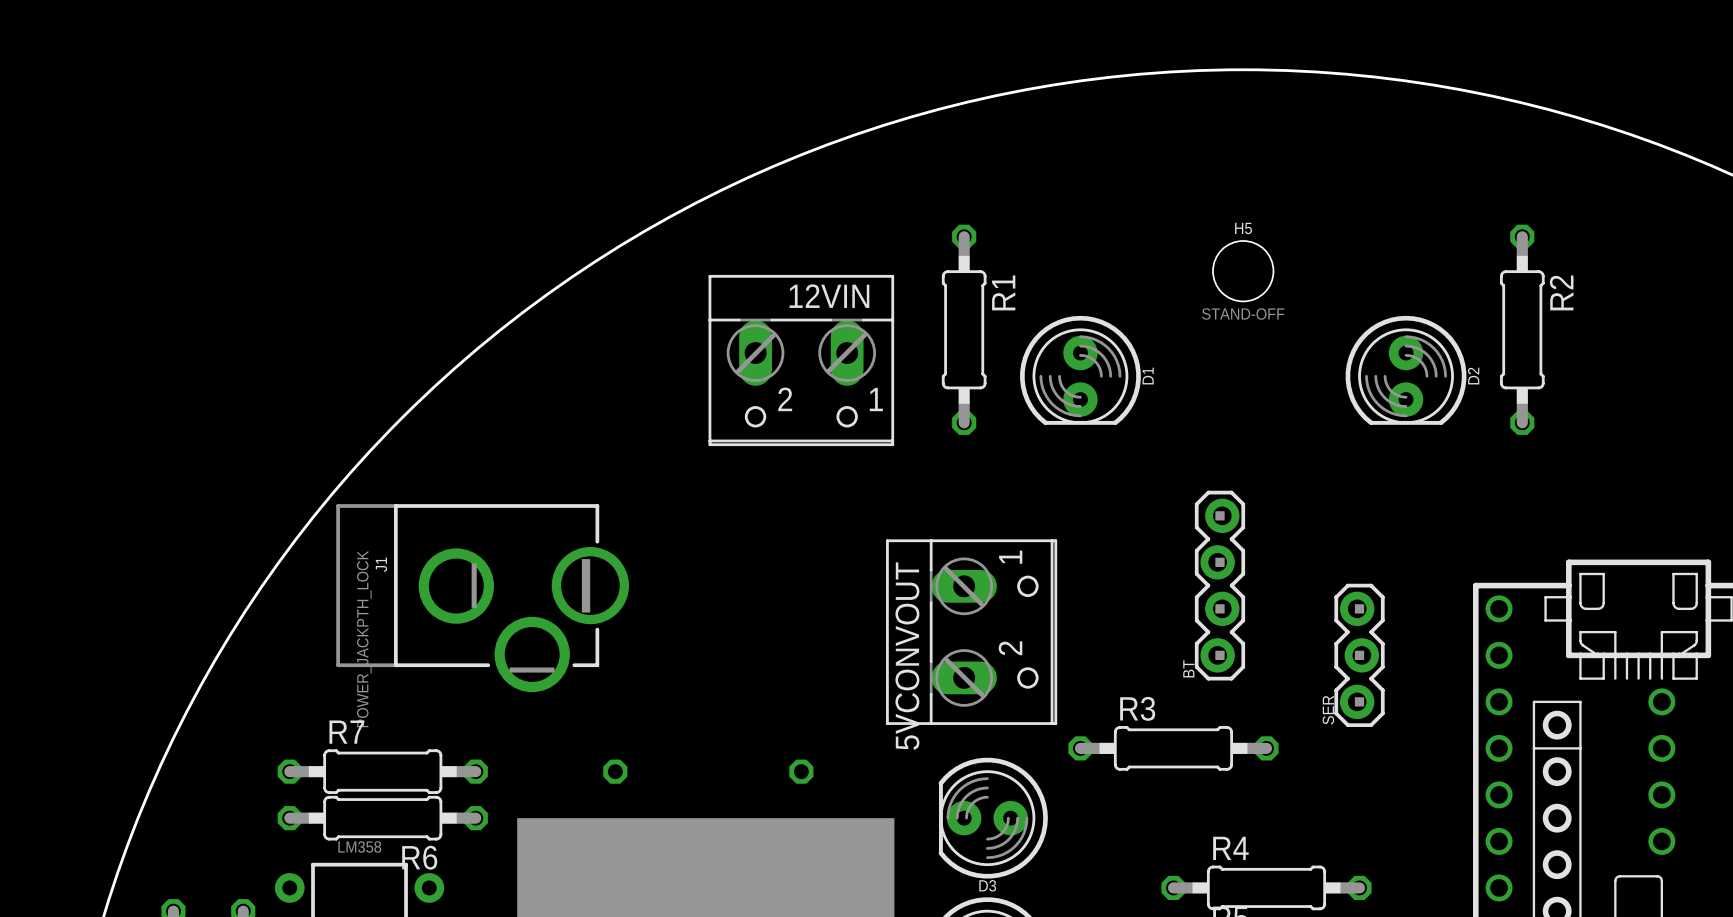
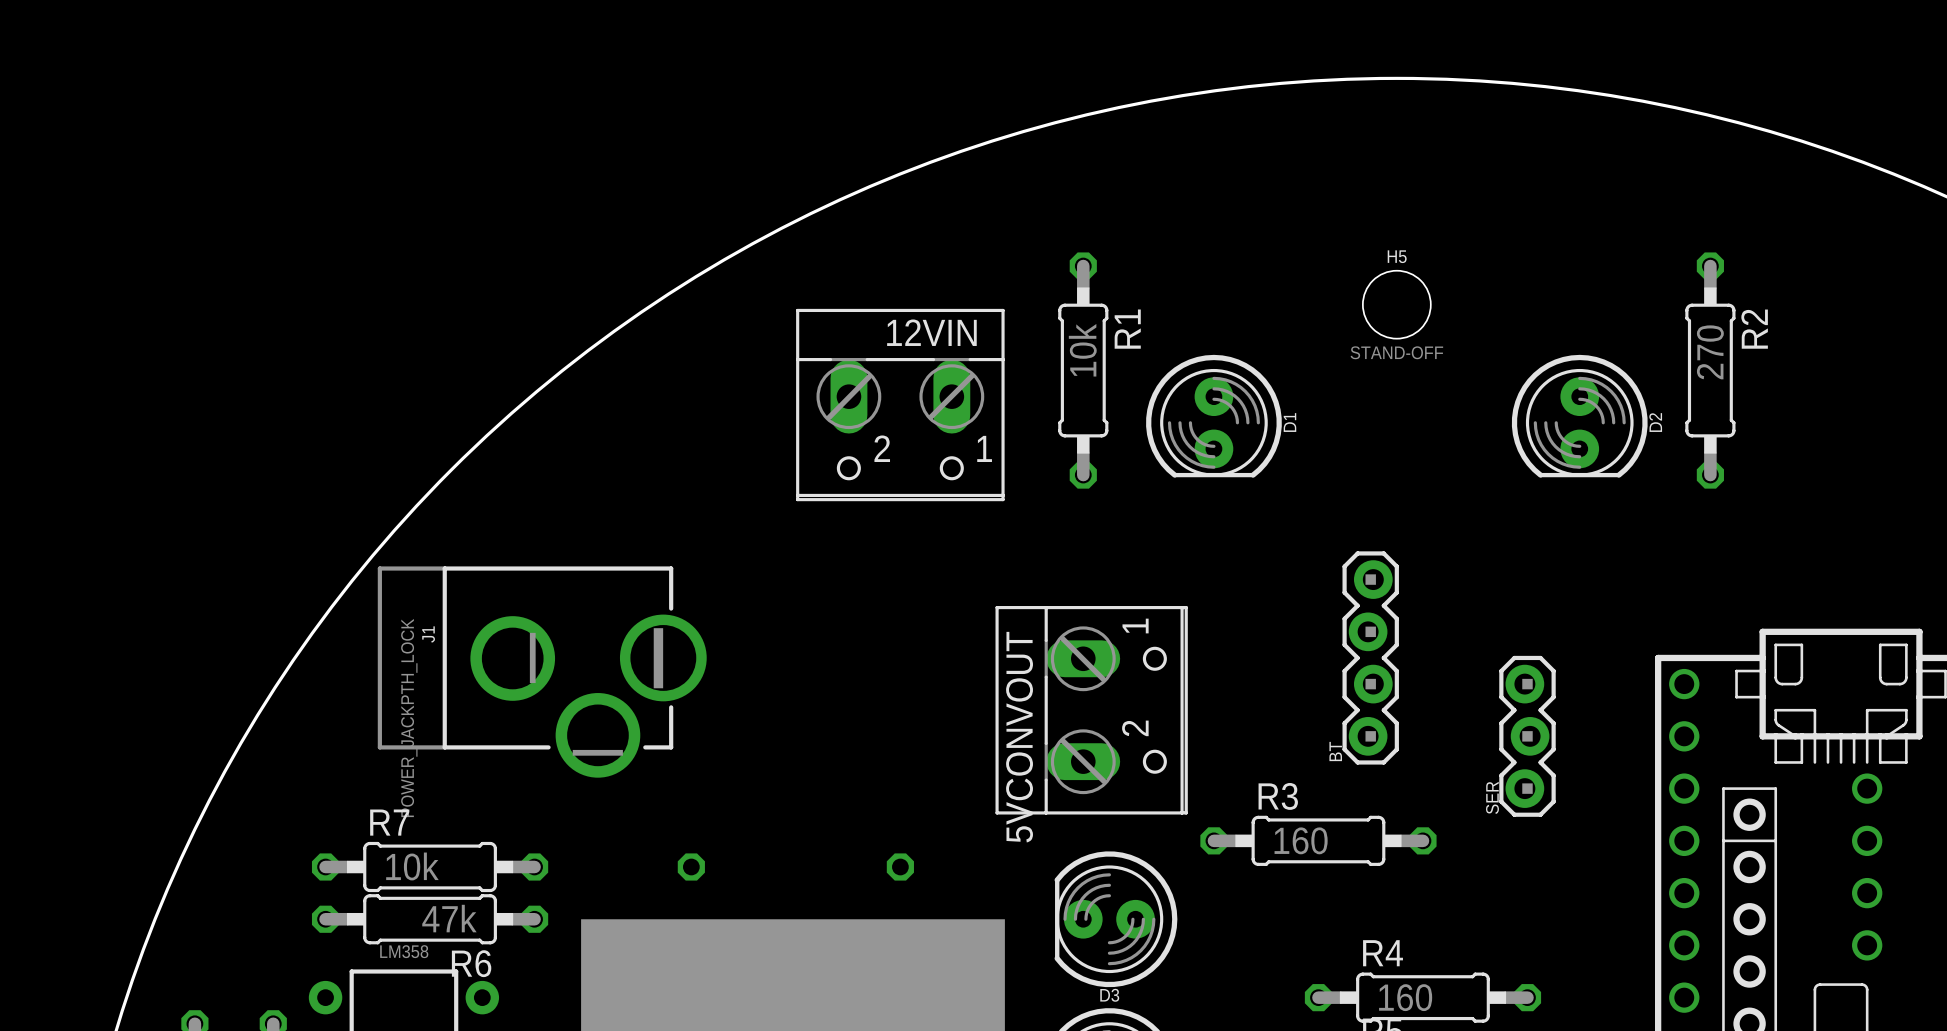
R1 value: none -> 10k (1082, 350)
R2 value: none -> 270 (1710, 352)
R3 value: none -> 160 (1301, 840)
R7 value: none -> 10k (412, 866)
R6 value: none -> 47k (449, 918)
R4 value: none -> 160 (1405, 997)

